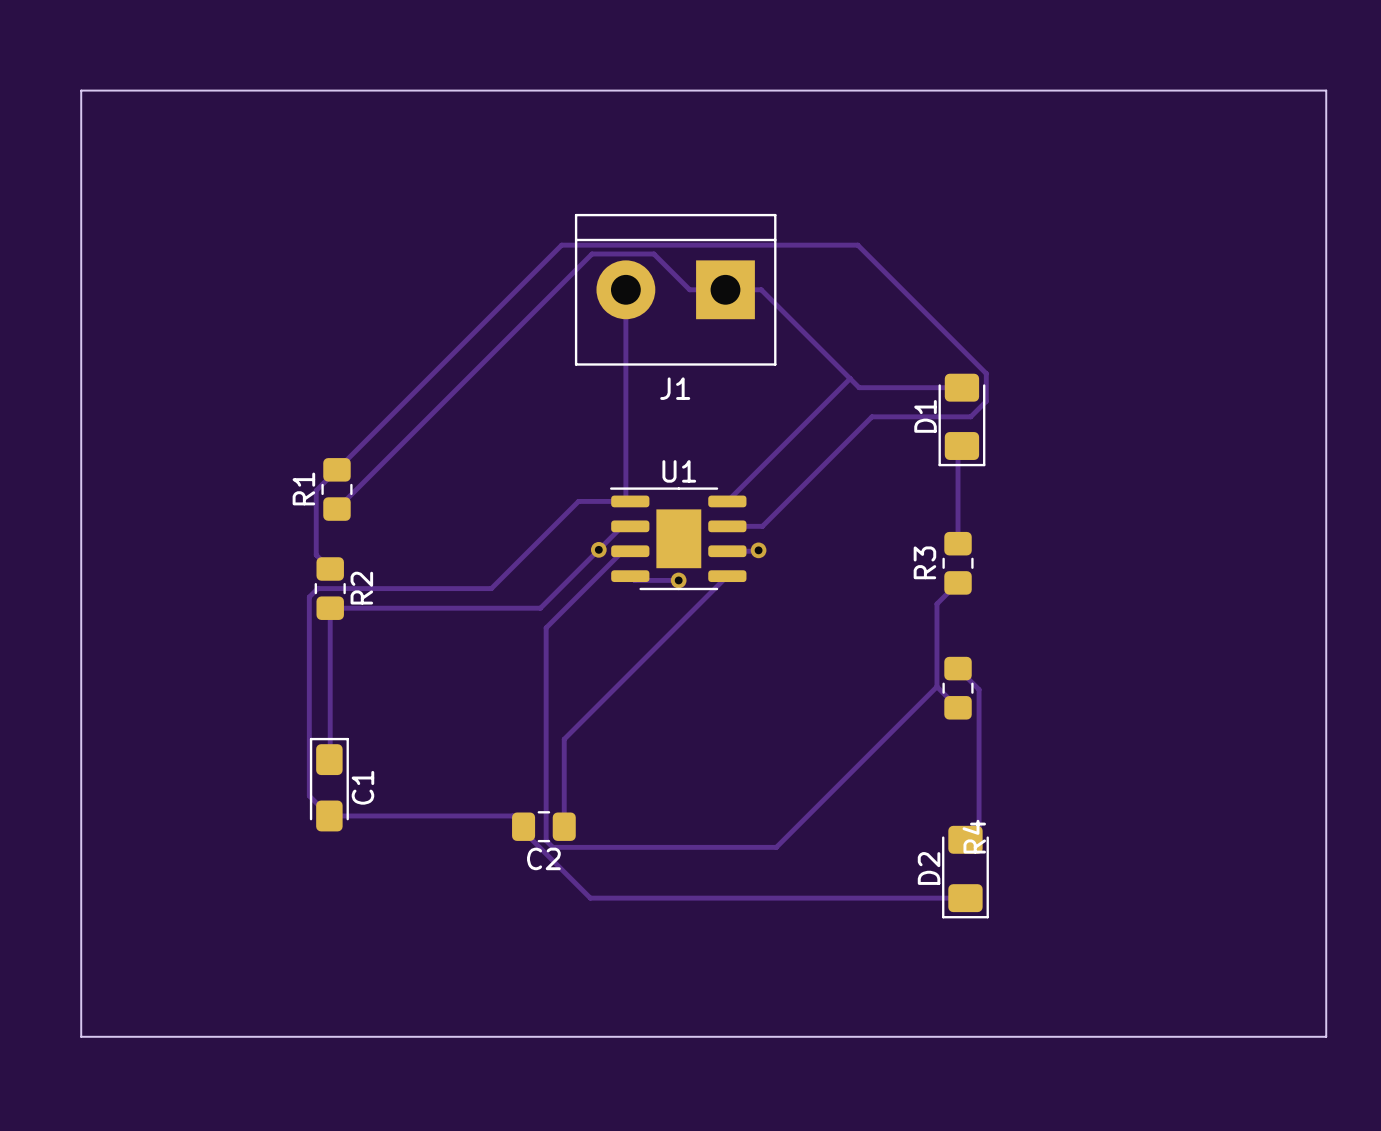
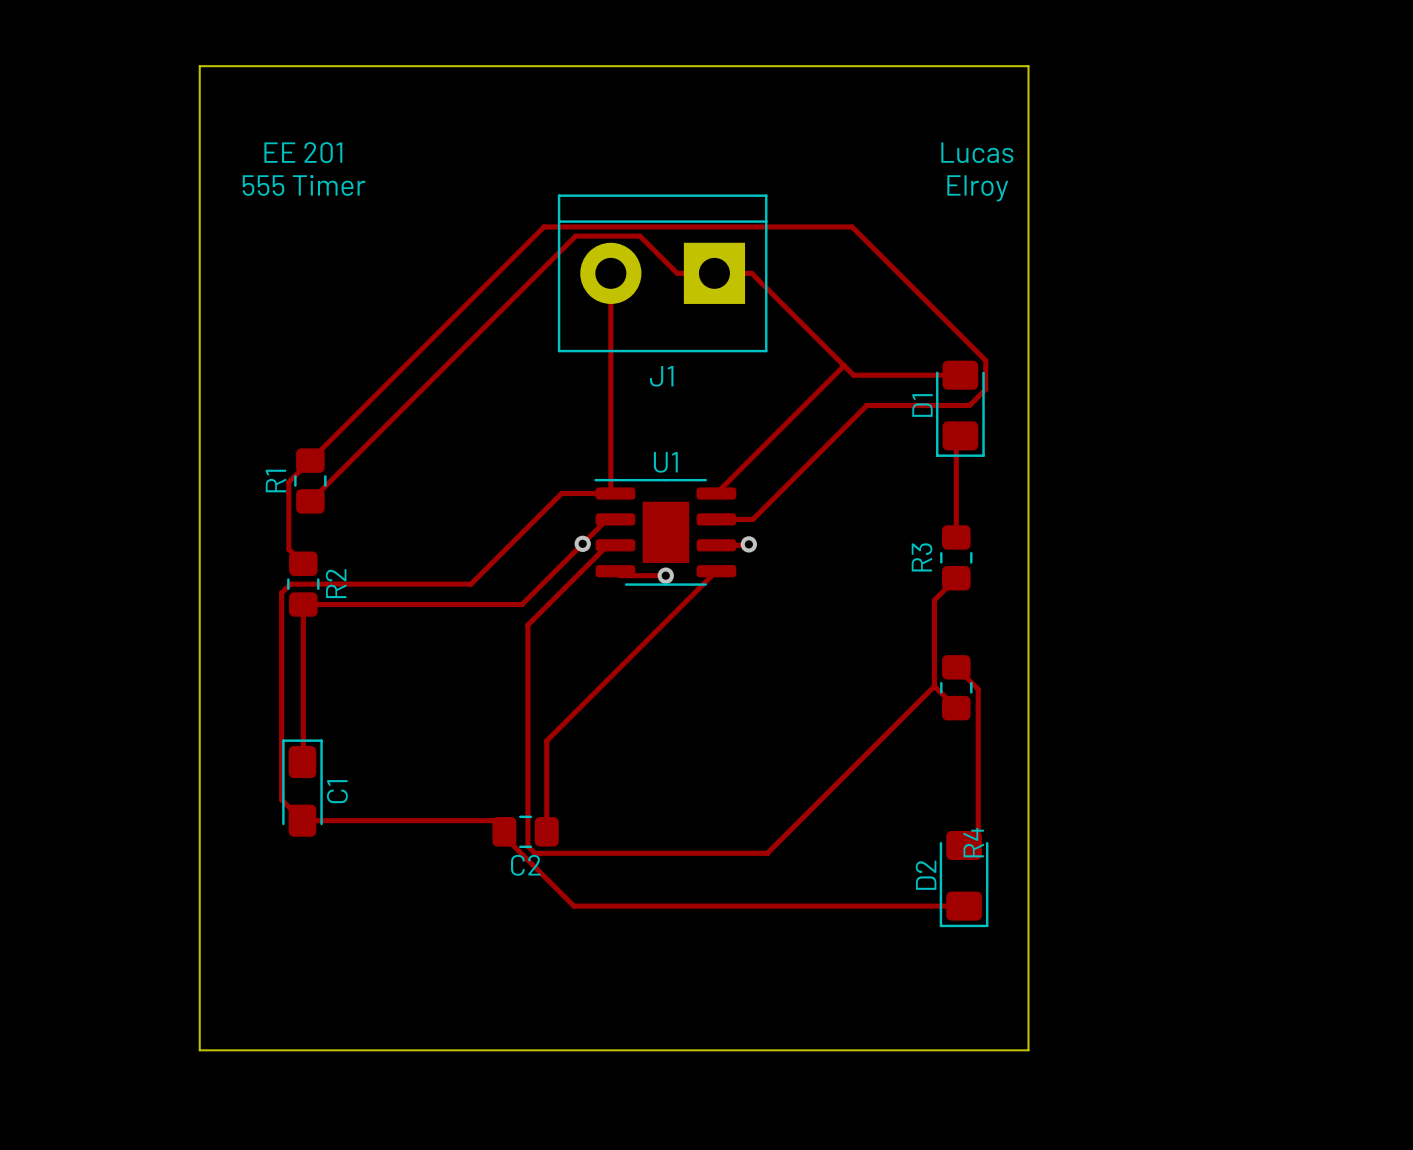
board edge: (230, 90) (81, 90) (81, 1036) (230, 1036) -> (199, 66) (199, 1050)
board edge: (1027, 90) (1326, 90) (1326, 1036) (1027, 1036) -> (1028, 66) (1028, 1050)
text: none -> EE 201 (303, 152)
text: none -> Lucas (977, 152)
text: none -> 555 Timer (304, 185)
text: none -> Elroy (977, 188)

